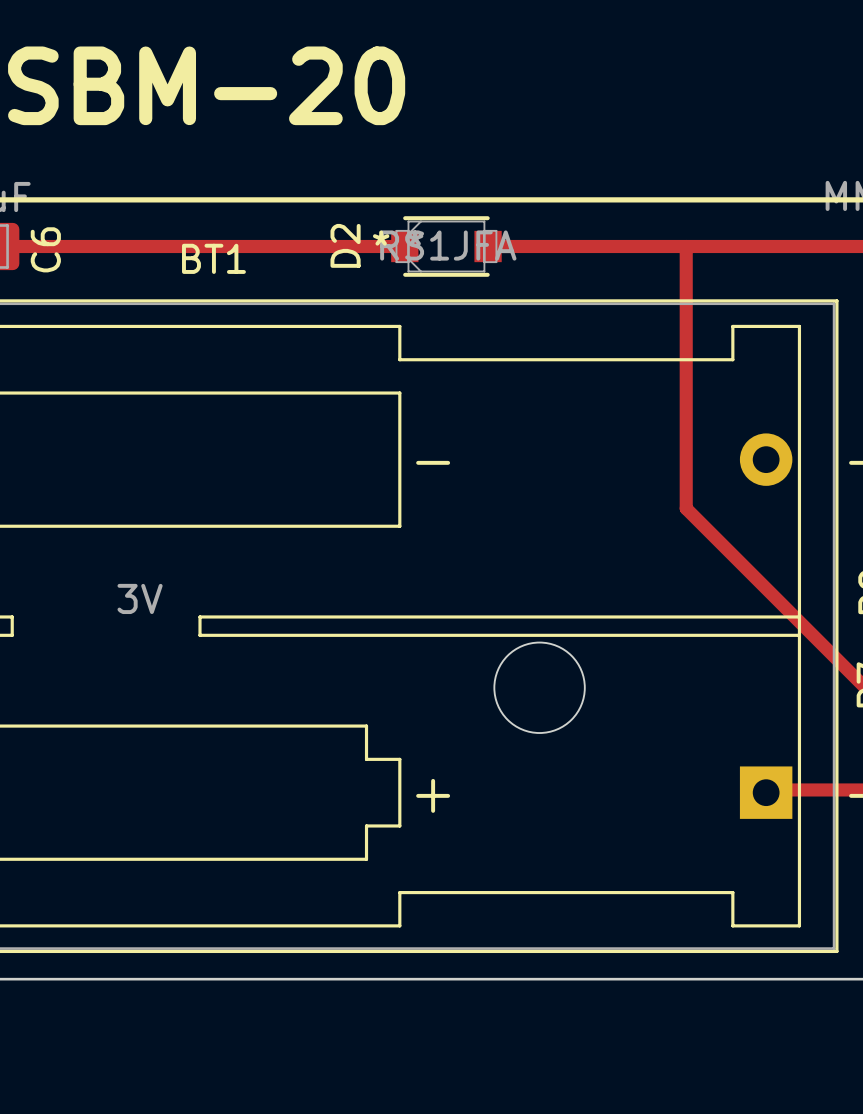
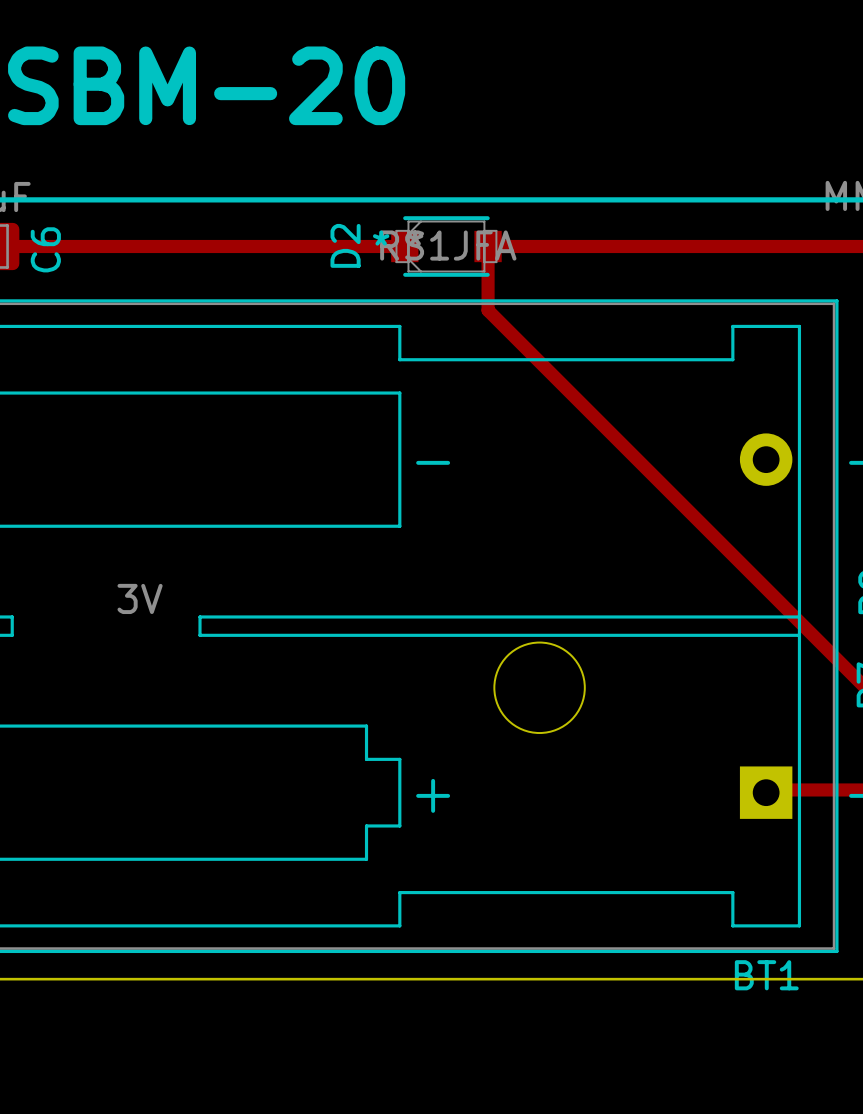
track: (686, 246) (686, 508) -> (488, 246) (488, 310) (686, 508)
BT1 name position: BT1 (213, 258) -> BT1 (766, 975)

